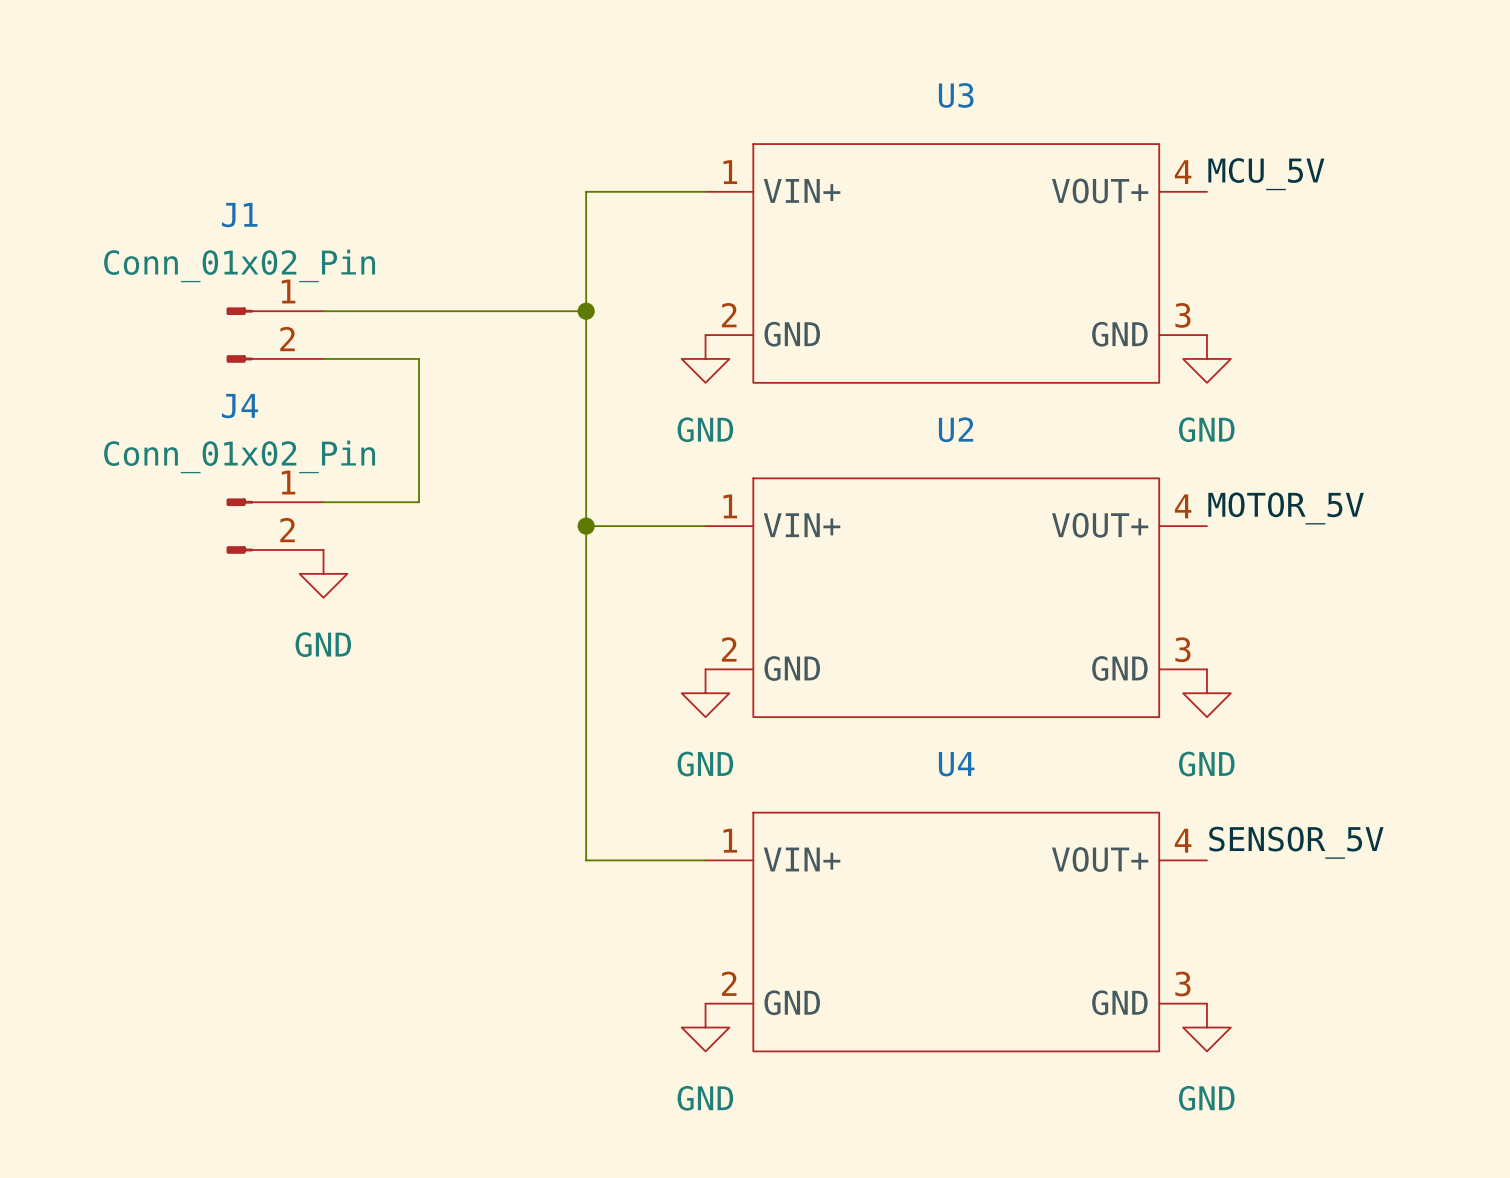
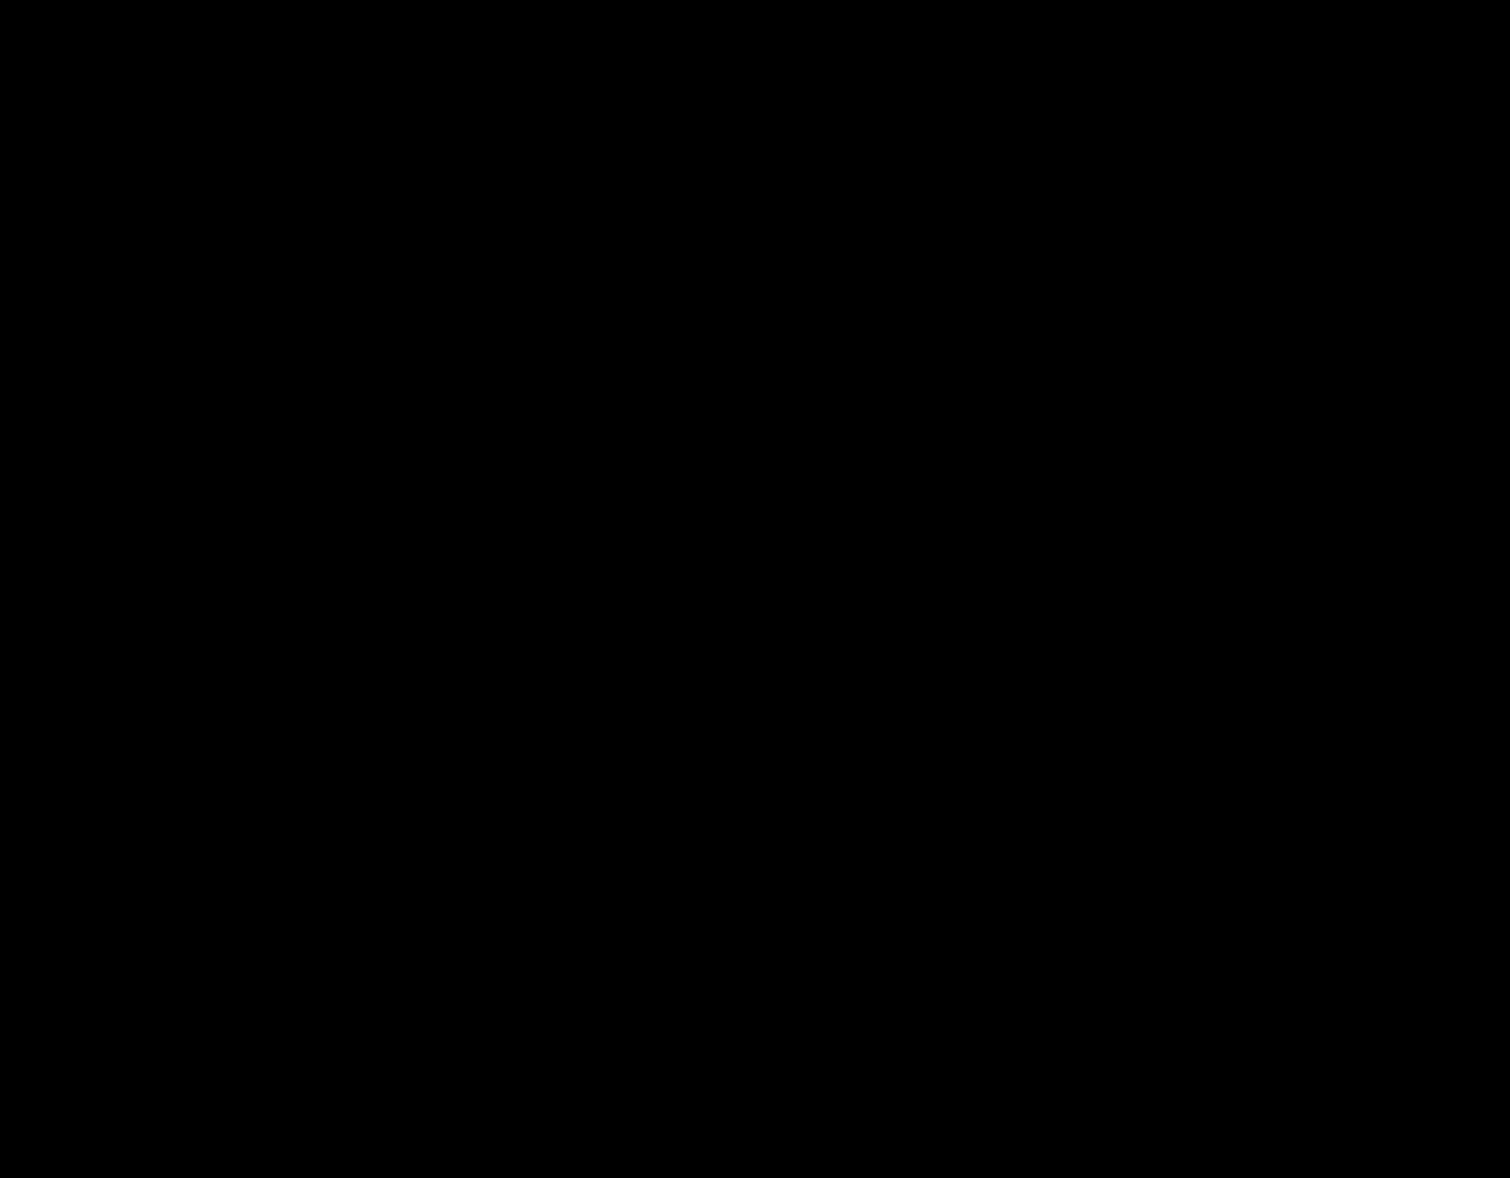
label: MCU_5V (1266, 174) -> none
wire: (705, 191) (586, 191) (586, 860) (705, 860) -> none
U3: (956, 263) -> none
wire: (323, 311) (586, 311) -> none
junction: (586, 311) -> none
J1: Conn_01x02_Pin (275, 335) -> none
wire: (323, 358) (419, 358) (419, 502) (323, 502) -> none
power symbol: GND (705, 358) -> none
power symbol: GND (1206, 358) -> none
label: MOTOR_5V (1286, 508) -> none
J4: Conn_01x02_Pin (275, 526) -> none
wire: (586, 526) (705, 526) -> none
junction: (586, 526) -> none
power symbol: GND (323, 573) -> none
U2: (956, 597) -> none
power symbol: GND (705, 693) -> none
power symbol: GND (1206, 693) -> none
label: SENSOR_5V (1296, 842) -> none
U4: (956, 932) -> none
power symbol: GND (705, 1027) -> none
power symbol: GND (1206, 1027) -> none

